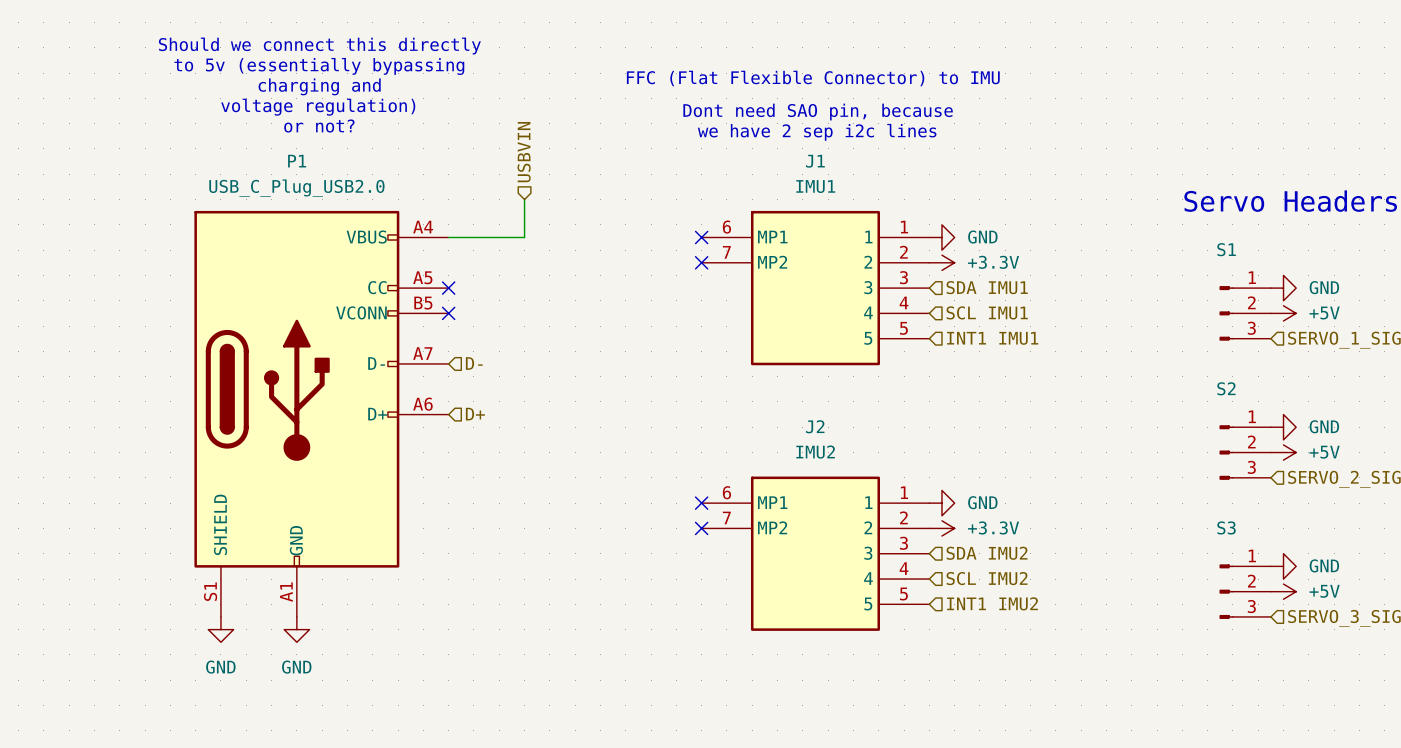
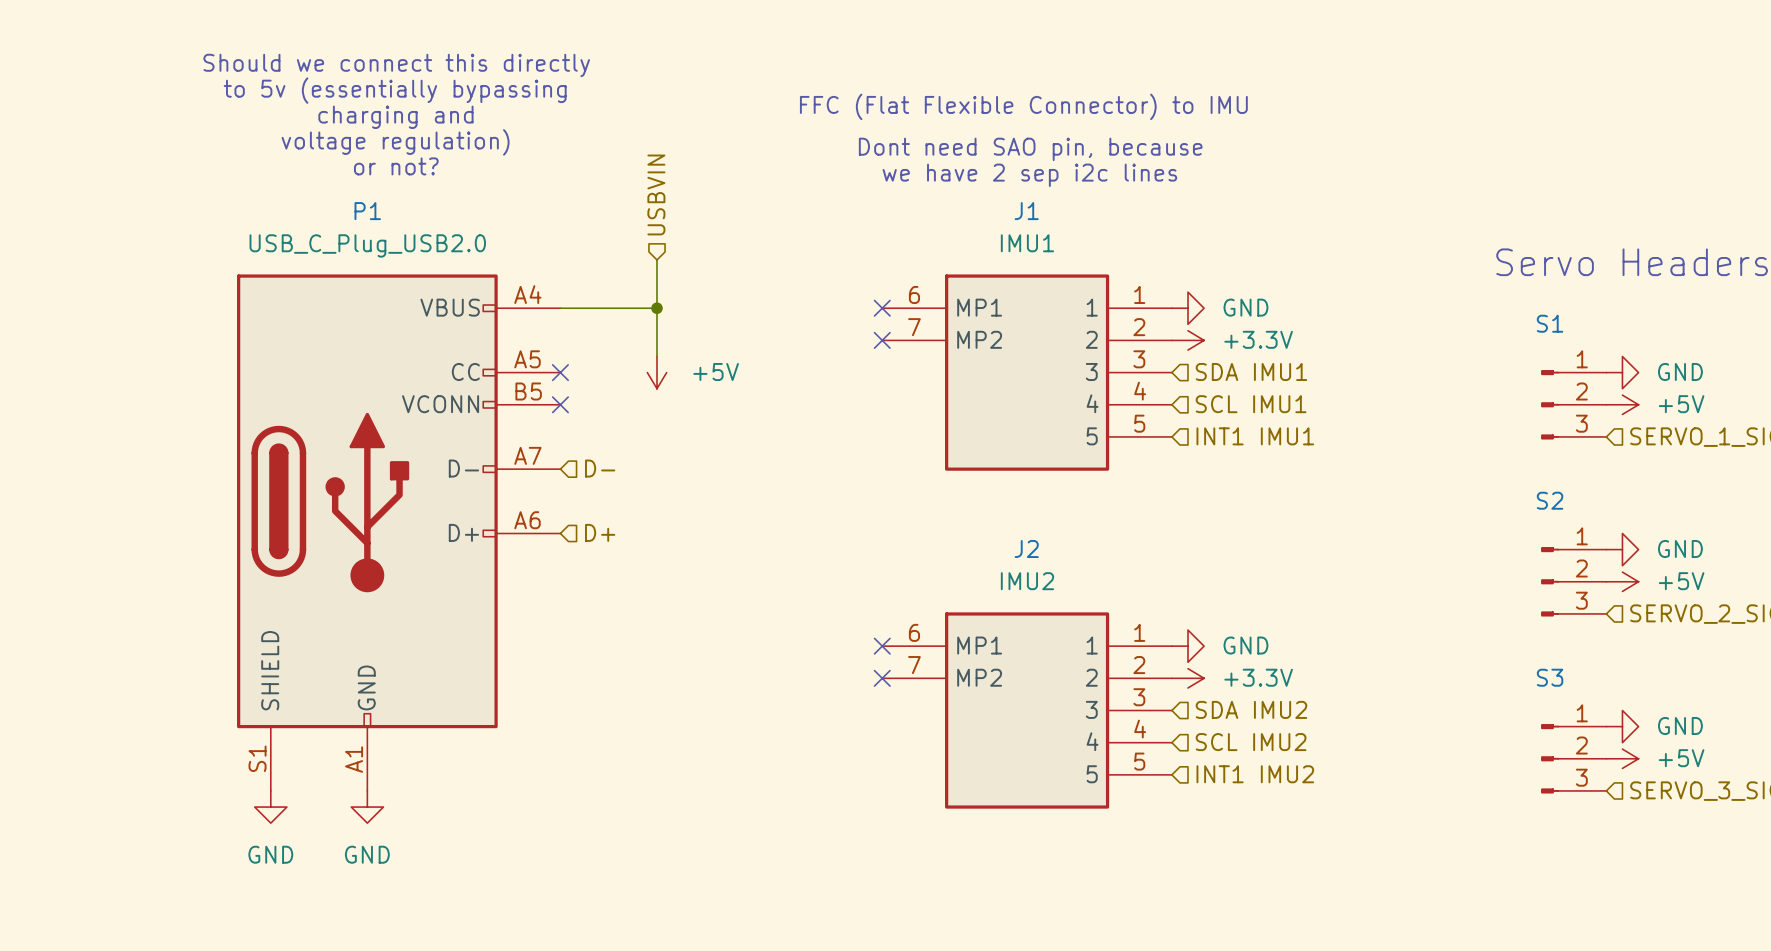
wire: none -> (656, 308) (656, 356)
junction: none -> (656, 308)
power symbol: none -> +5V (656, 372)

